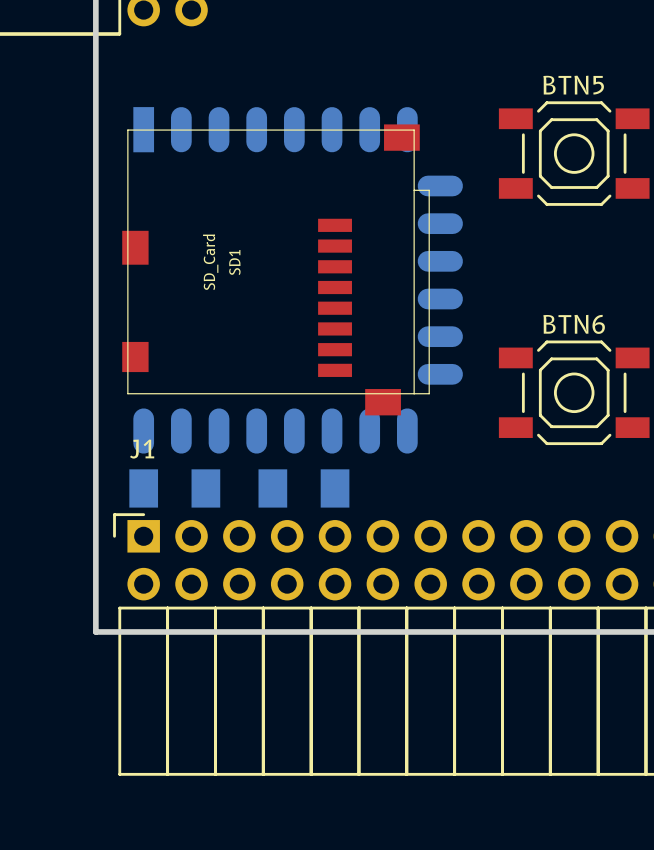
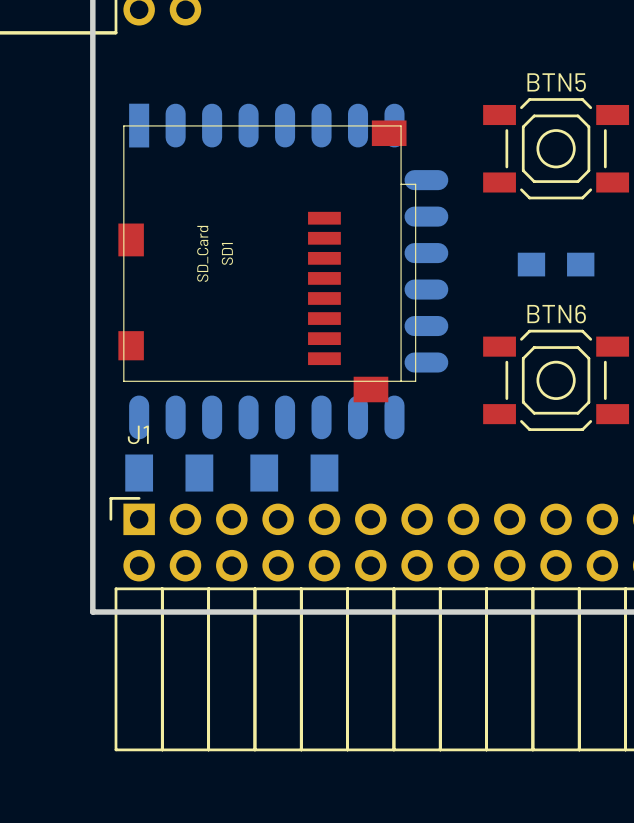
part: none -> (556, 264)

